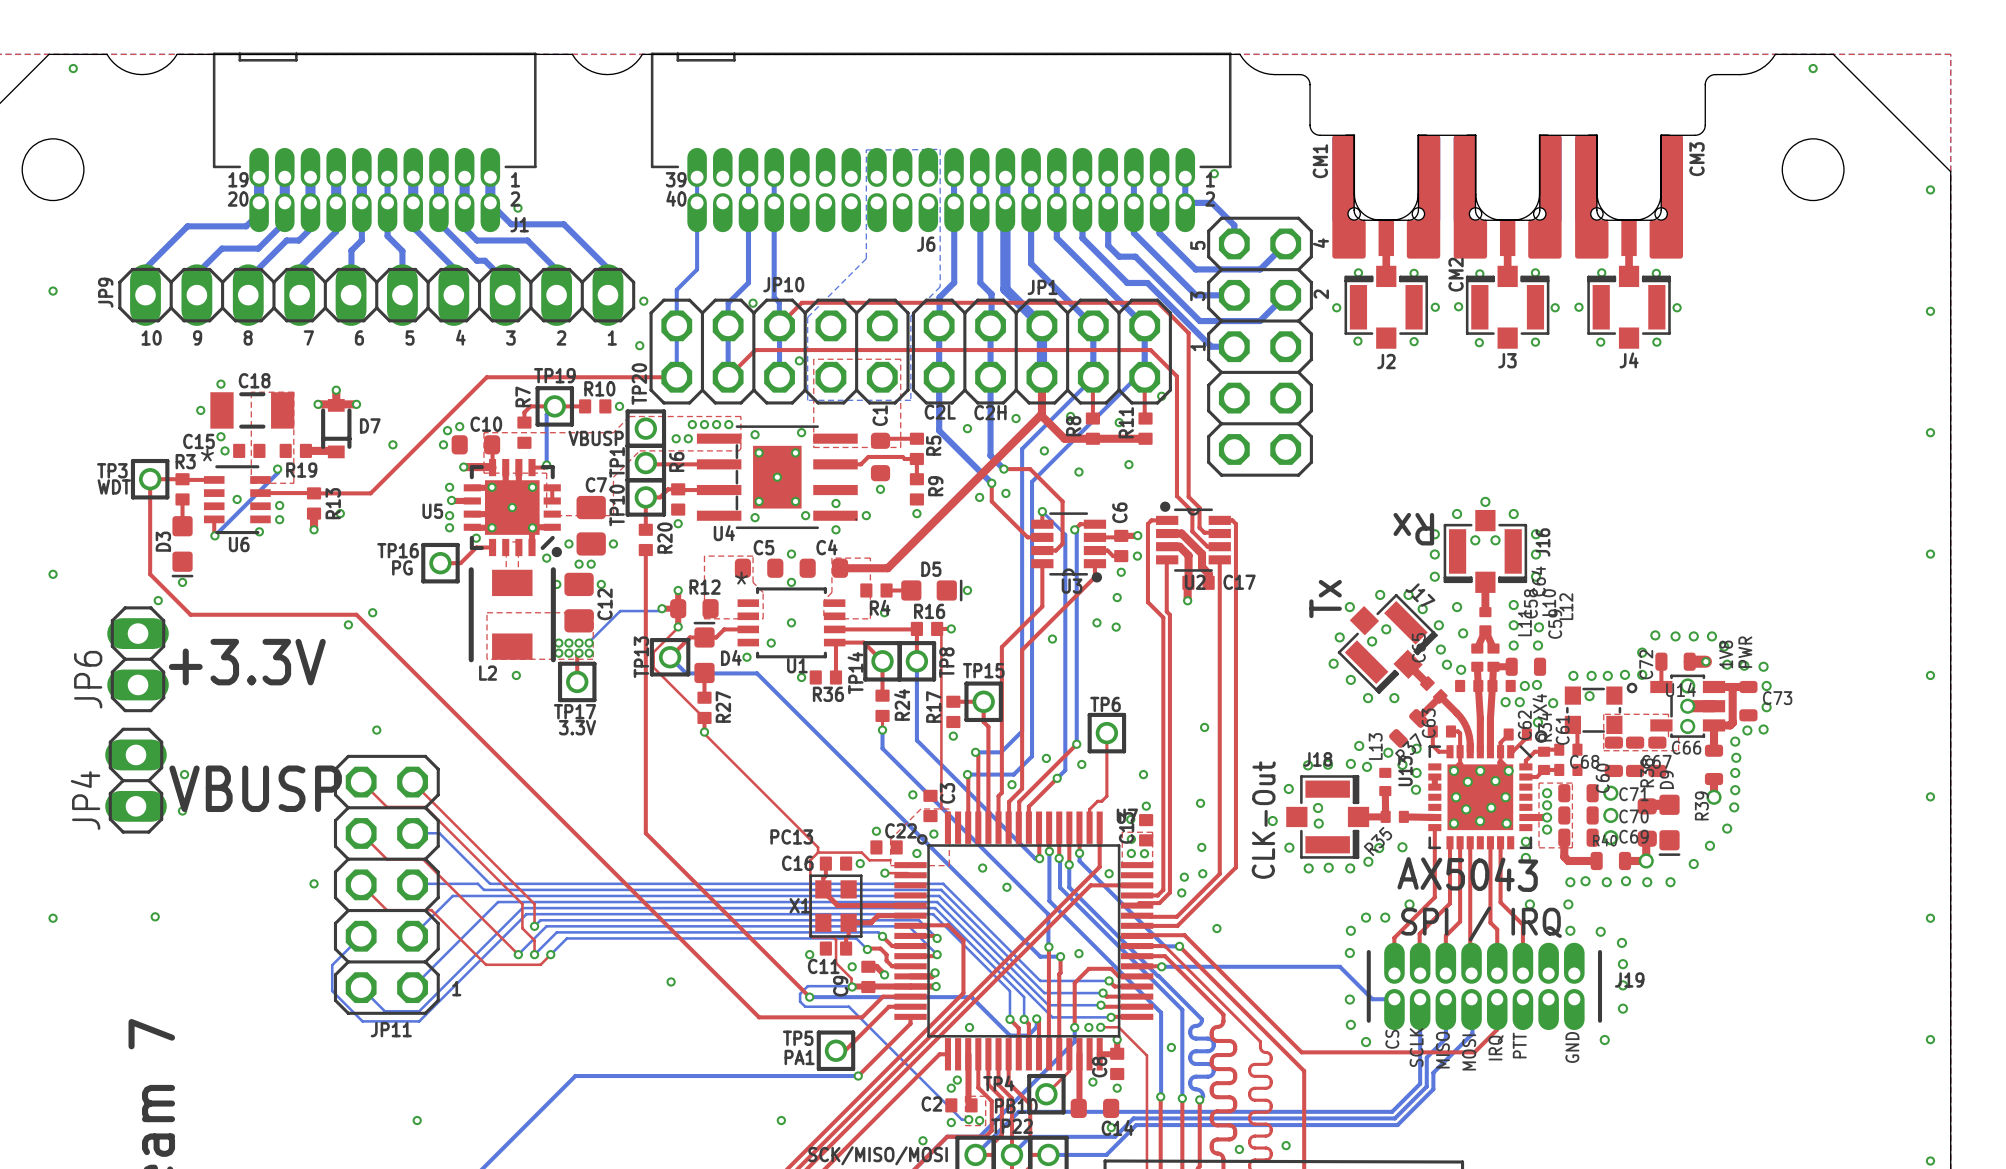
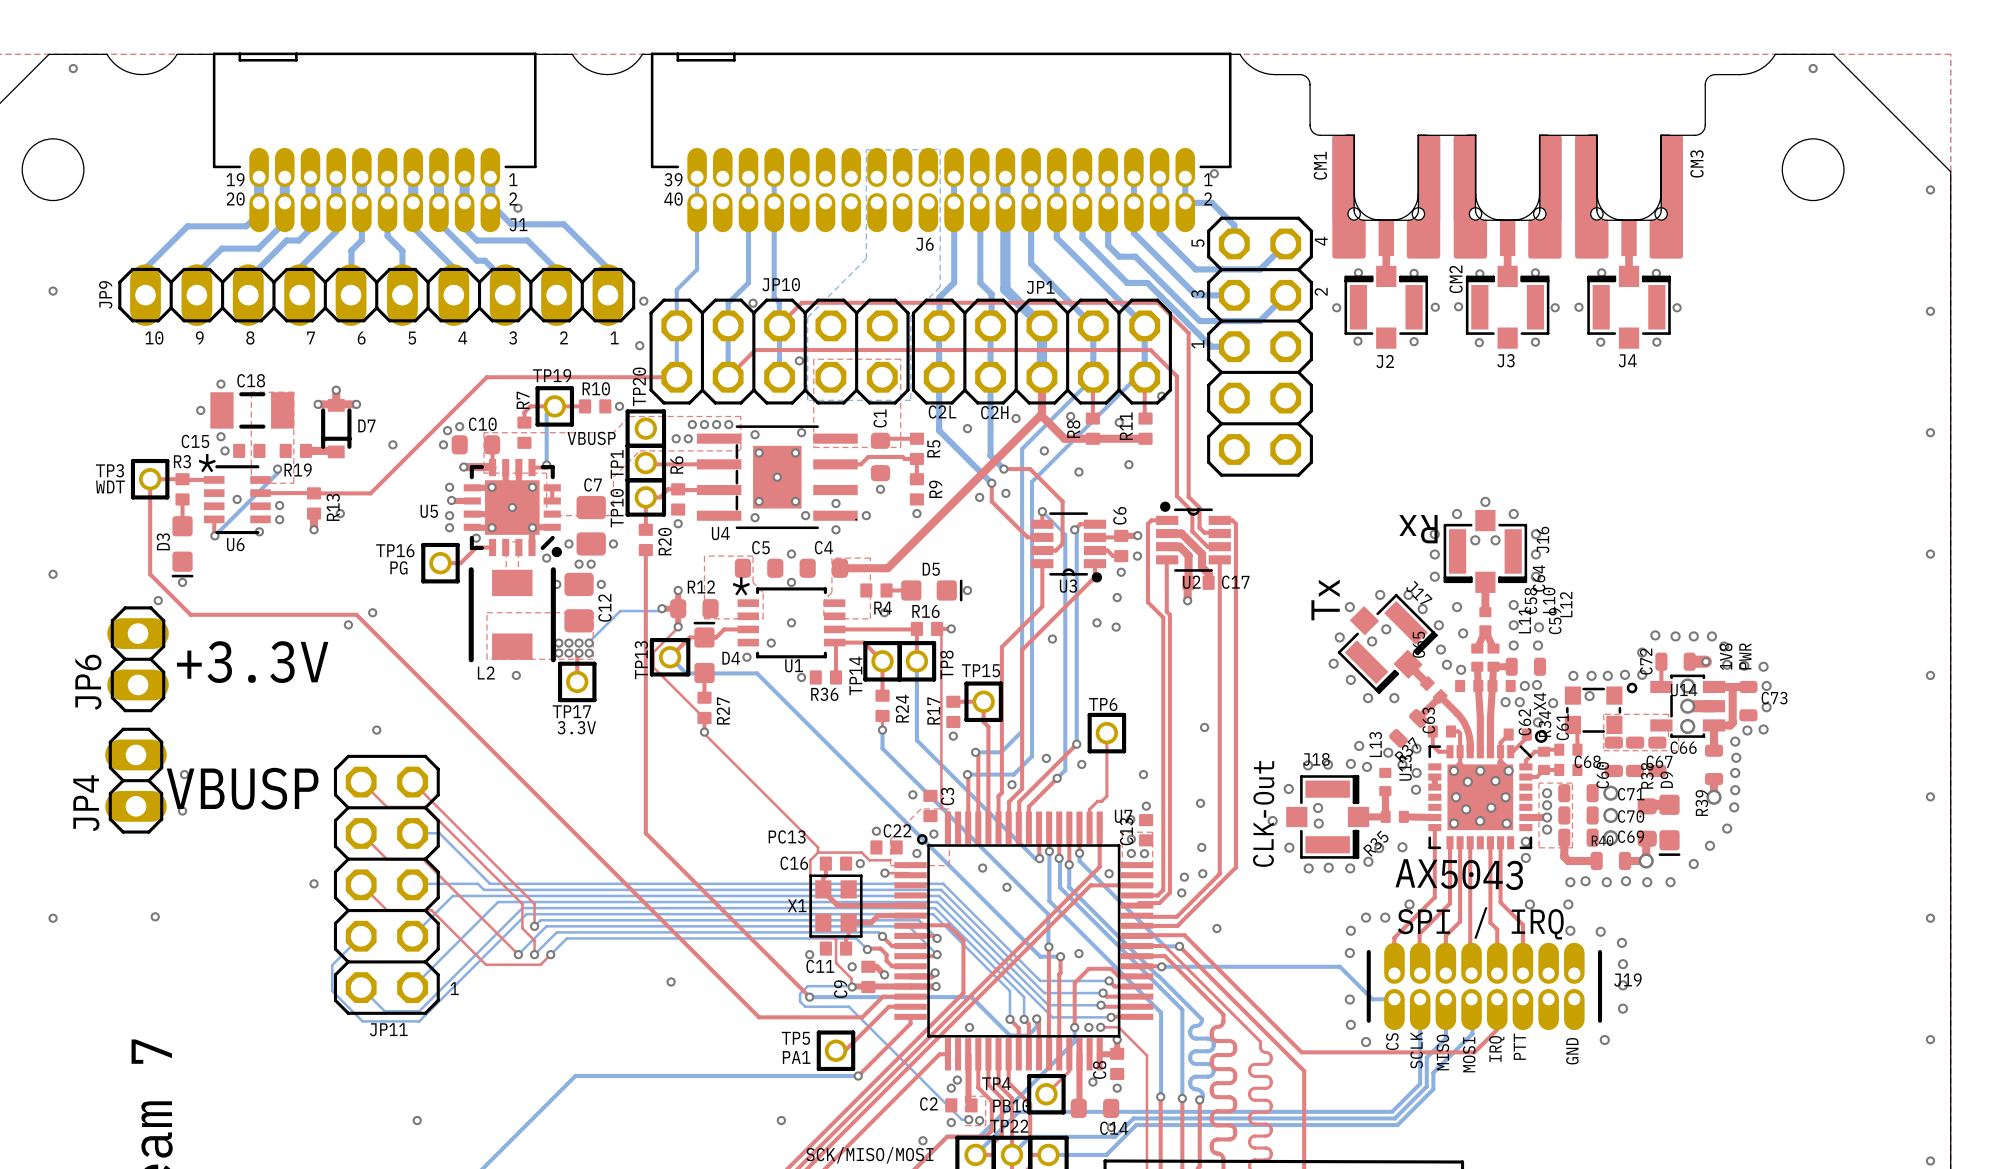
via: (1171, 1047) -> none
via: (1286, 1145) -> none
via: (1239, 1149) -> none

